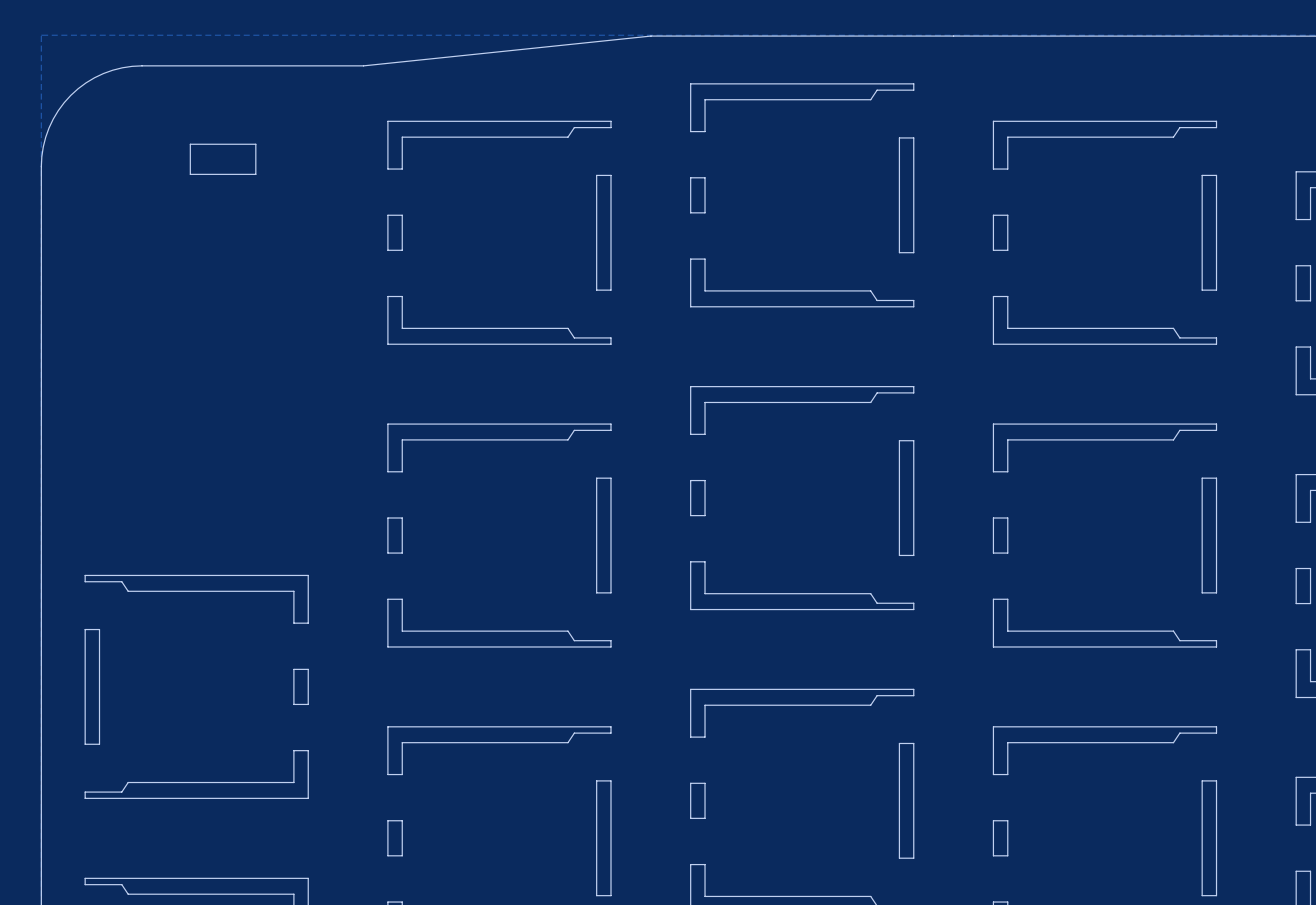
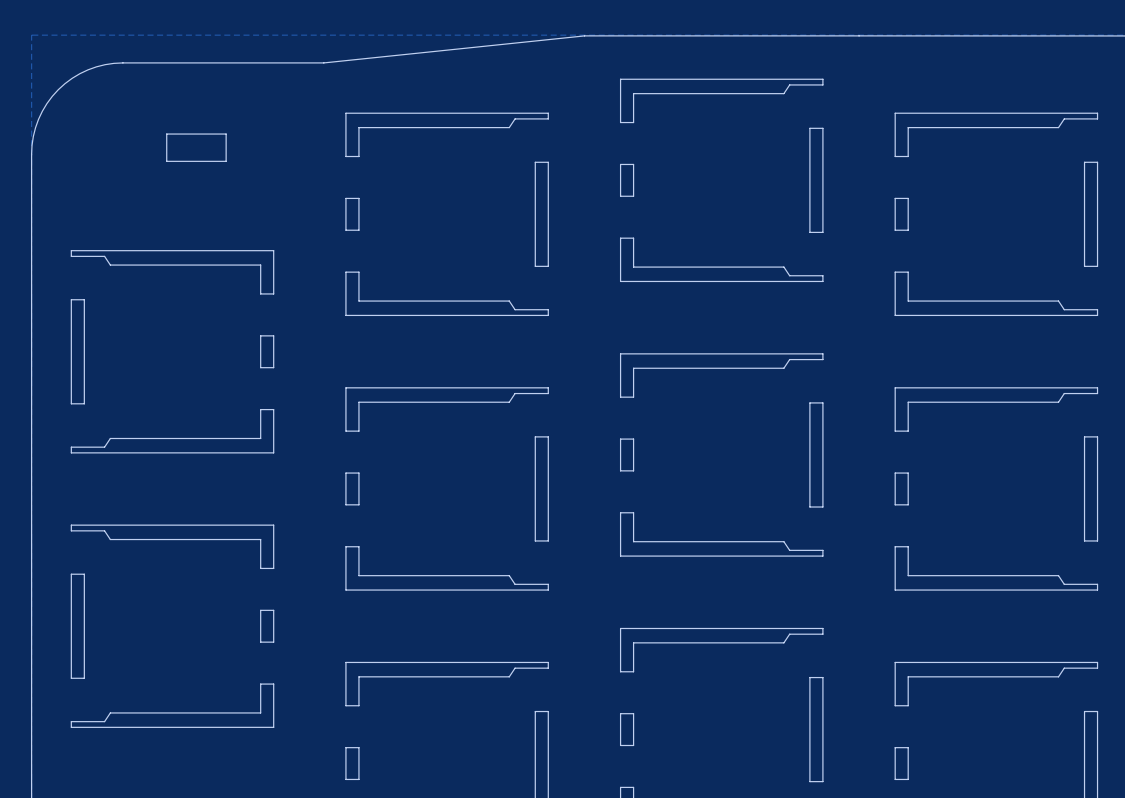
board edge: none -> (71, 250) (71, 256) (104, 256) (110, 265) (260, 265) (260, 293) (273, 293) (273, 250) (71, 250)
board edge: none -> (71, 299) (71, 403) (84, 403) (84, 299) (71, 299)
board edge: none -> (260, 335) (260, 367) (273, 367) (273, 335) (260, 335)
board edge: none -> (260, 409) (260, 438) (110, 438) (104, 447) (71, 447) (71, 452) (273, 452) (273, 409) (260, 409)

